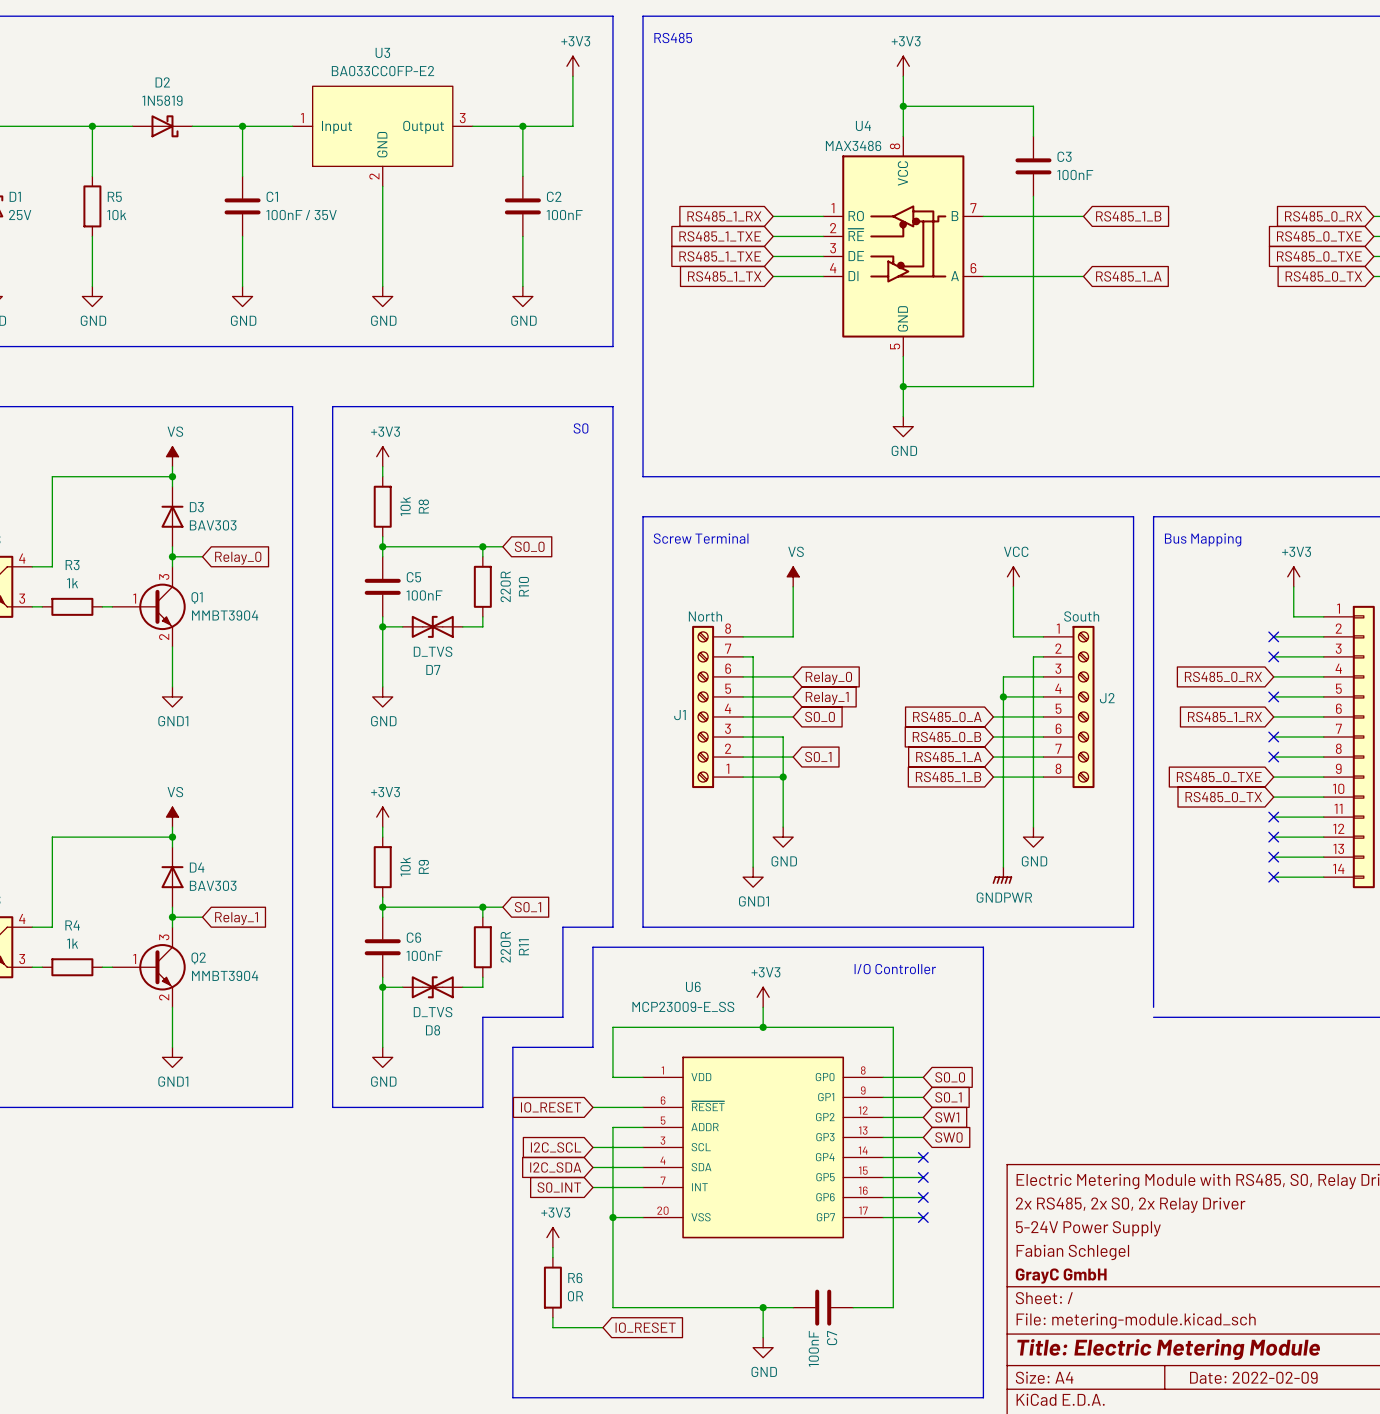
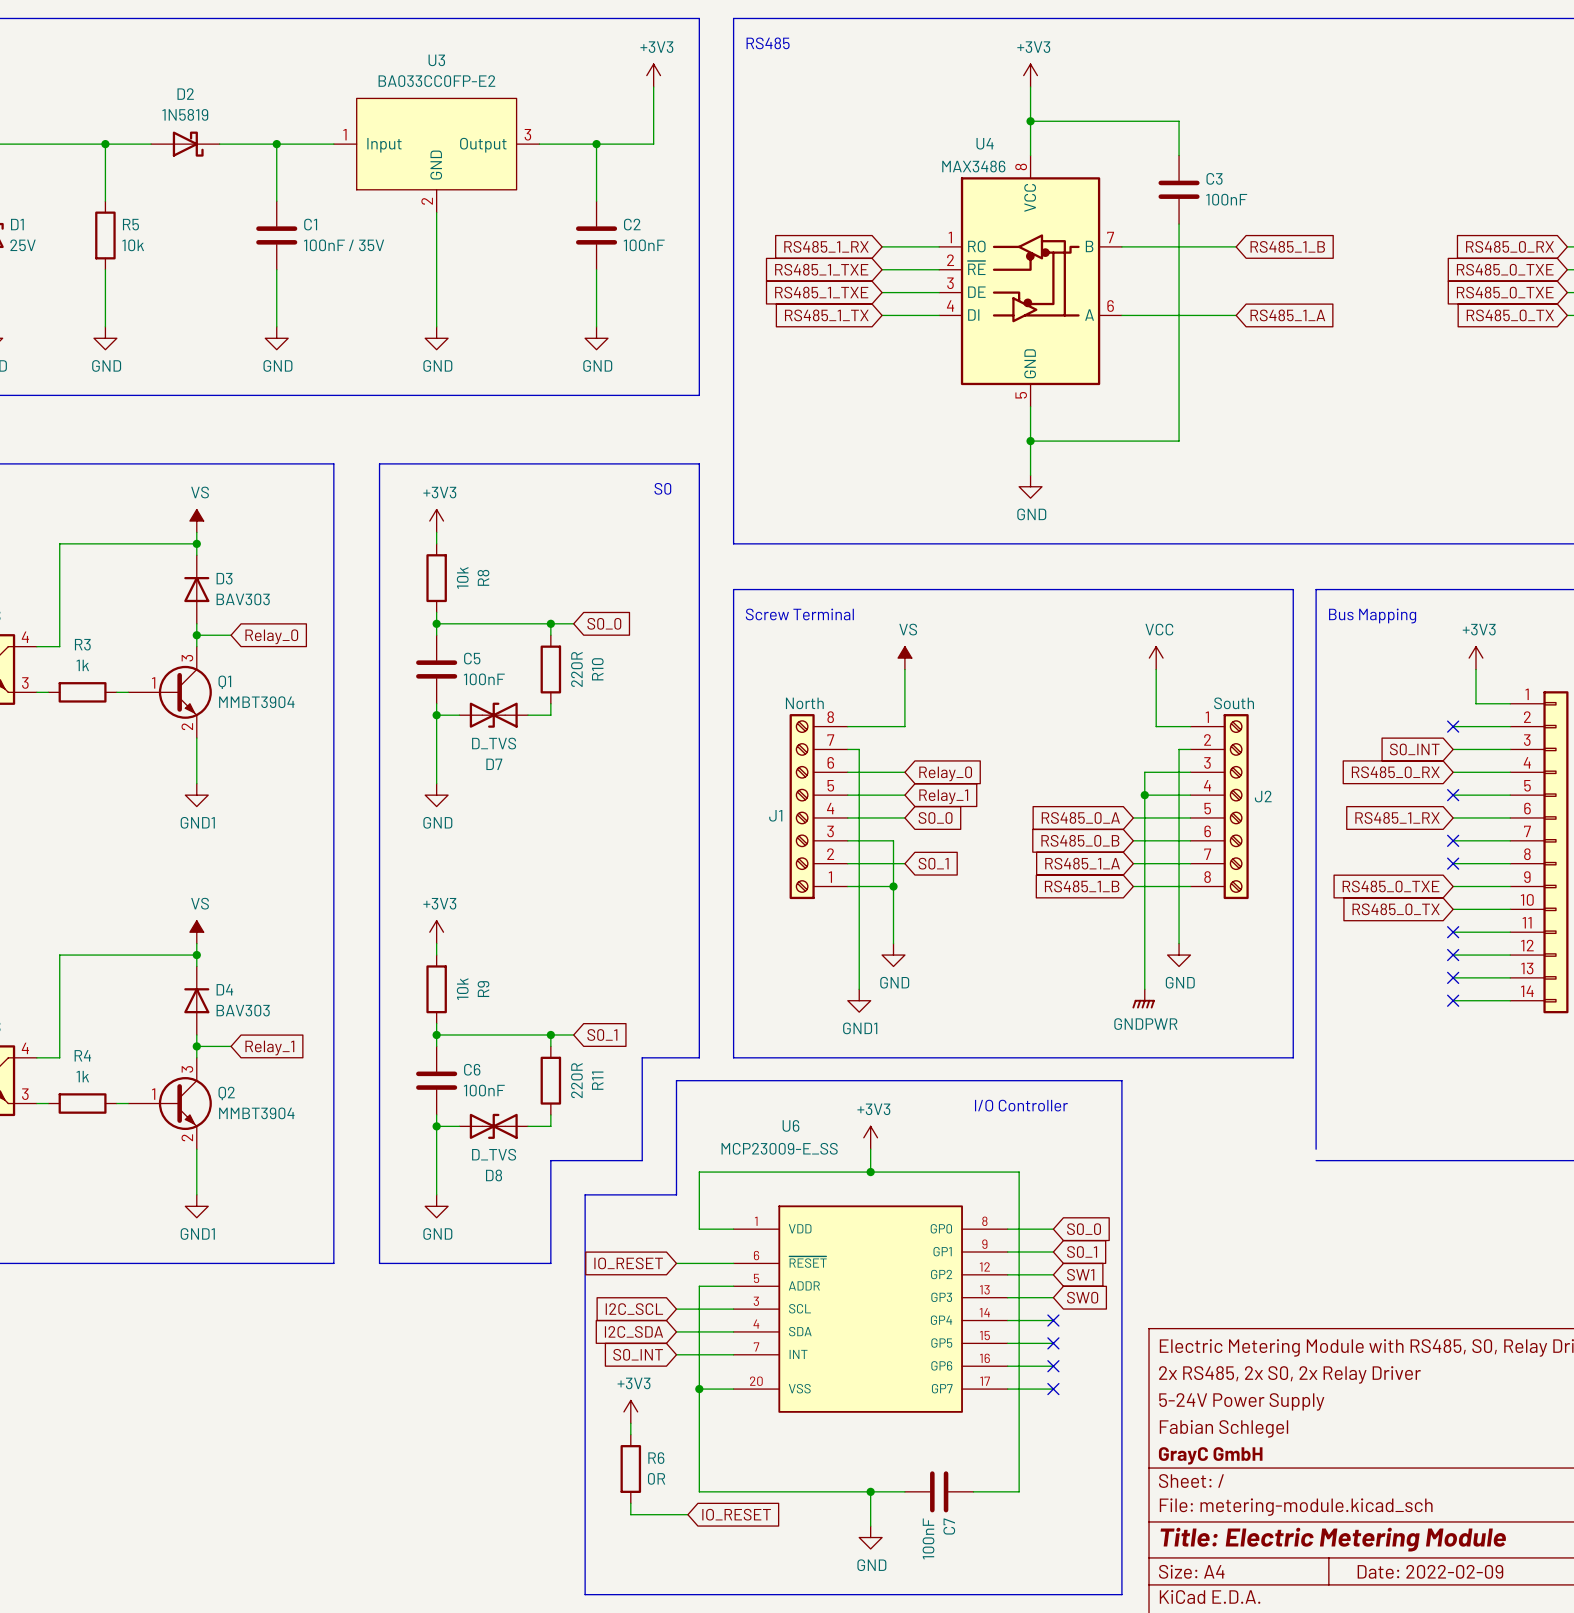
global label: none -> S0_INT (1414, 749)
no-connect mark: (1273, 656) -> none

